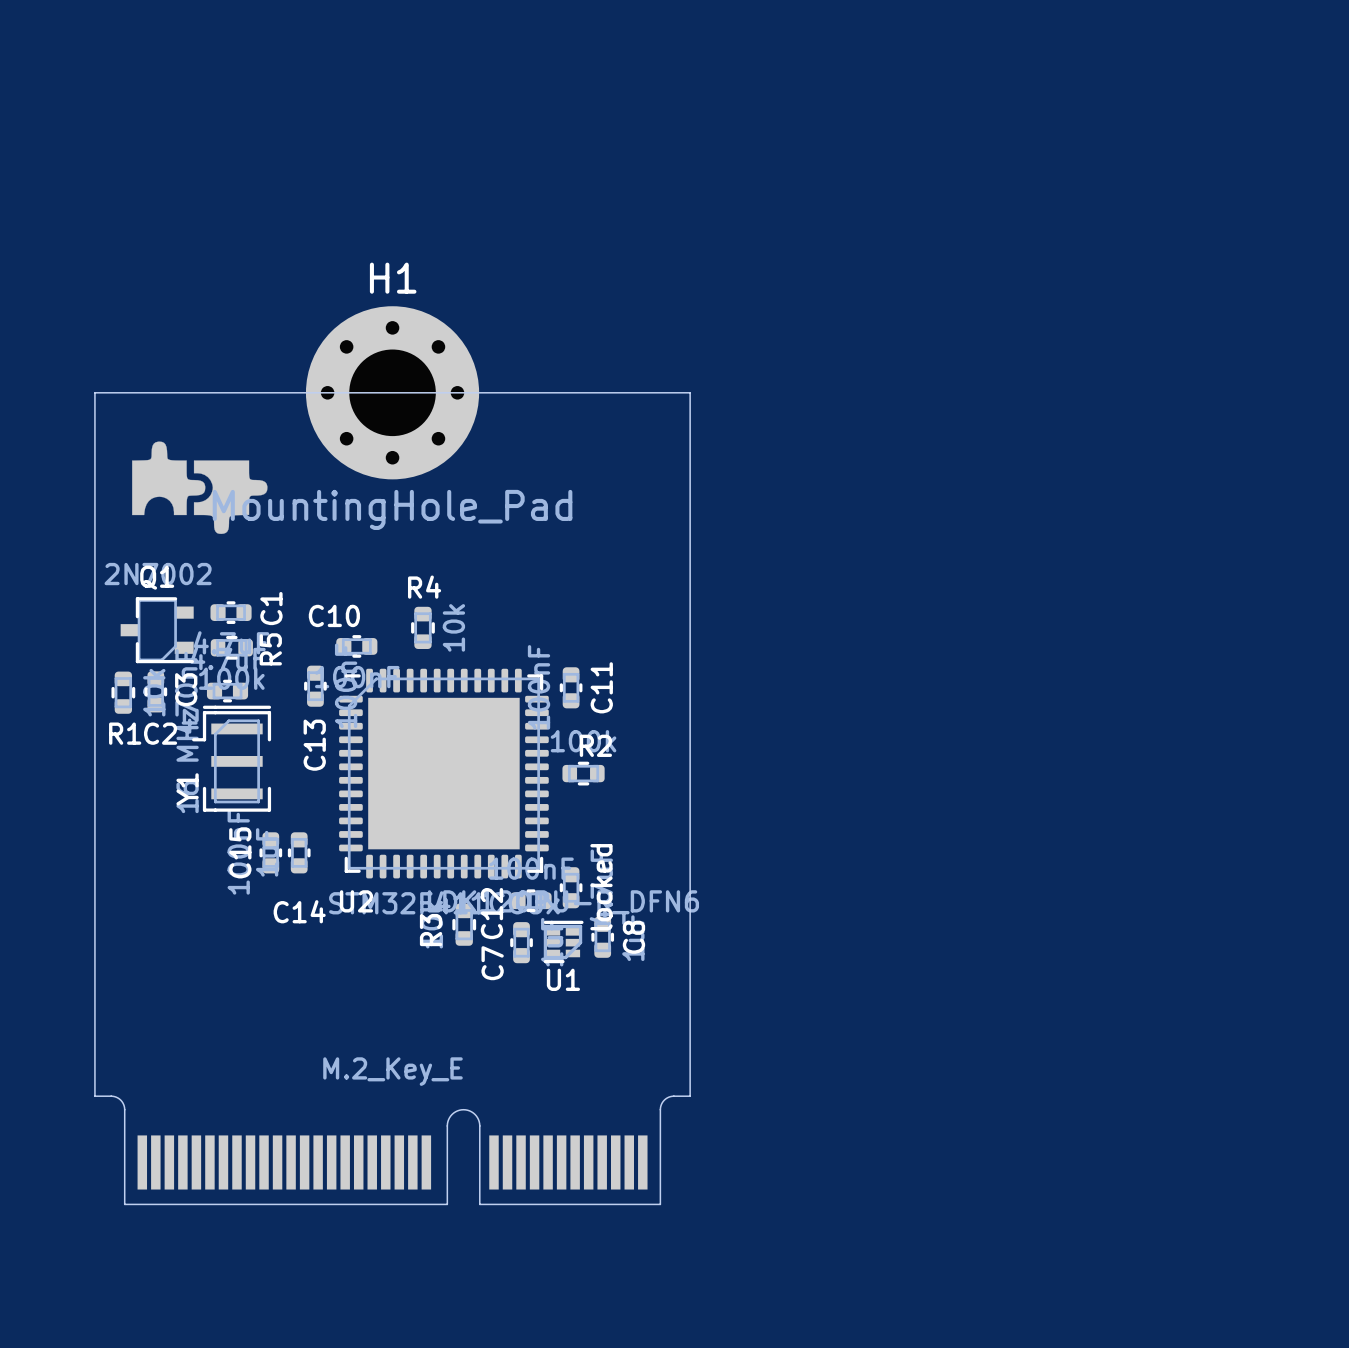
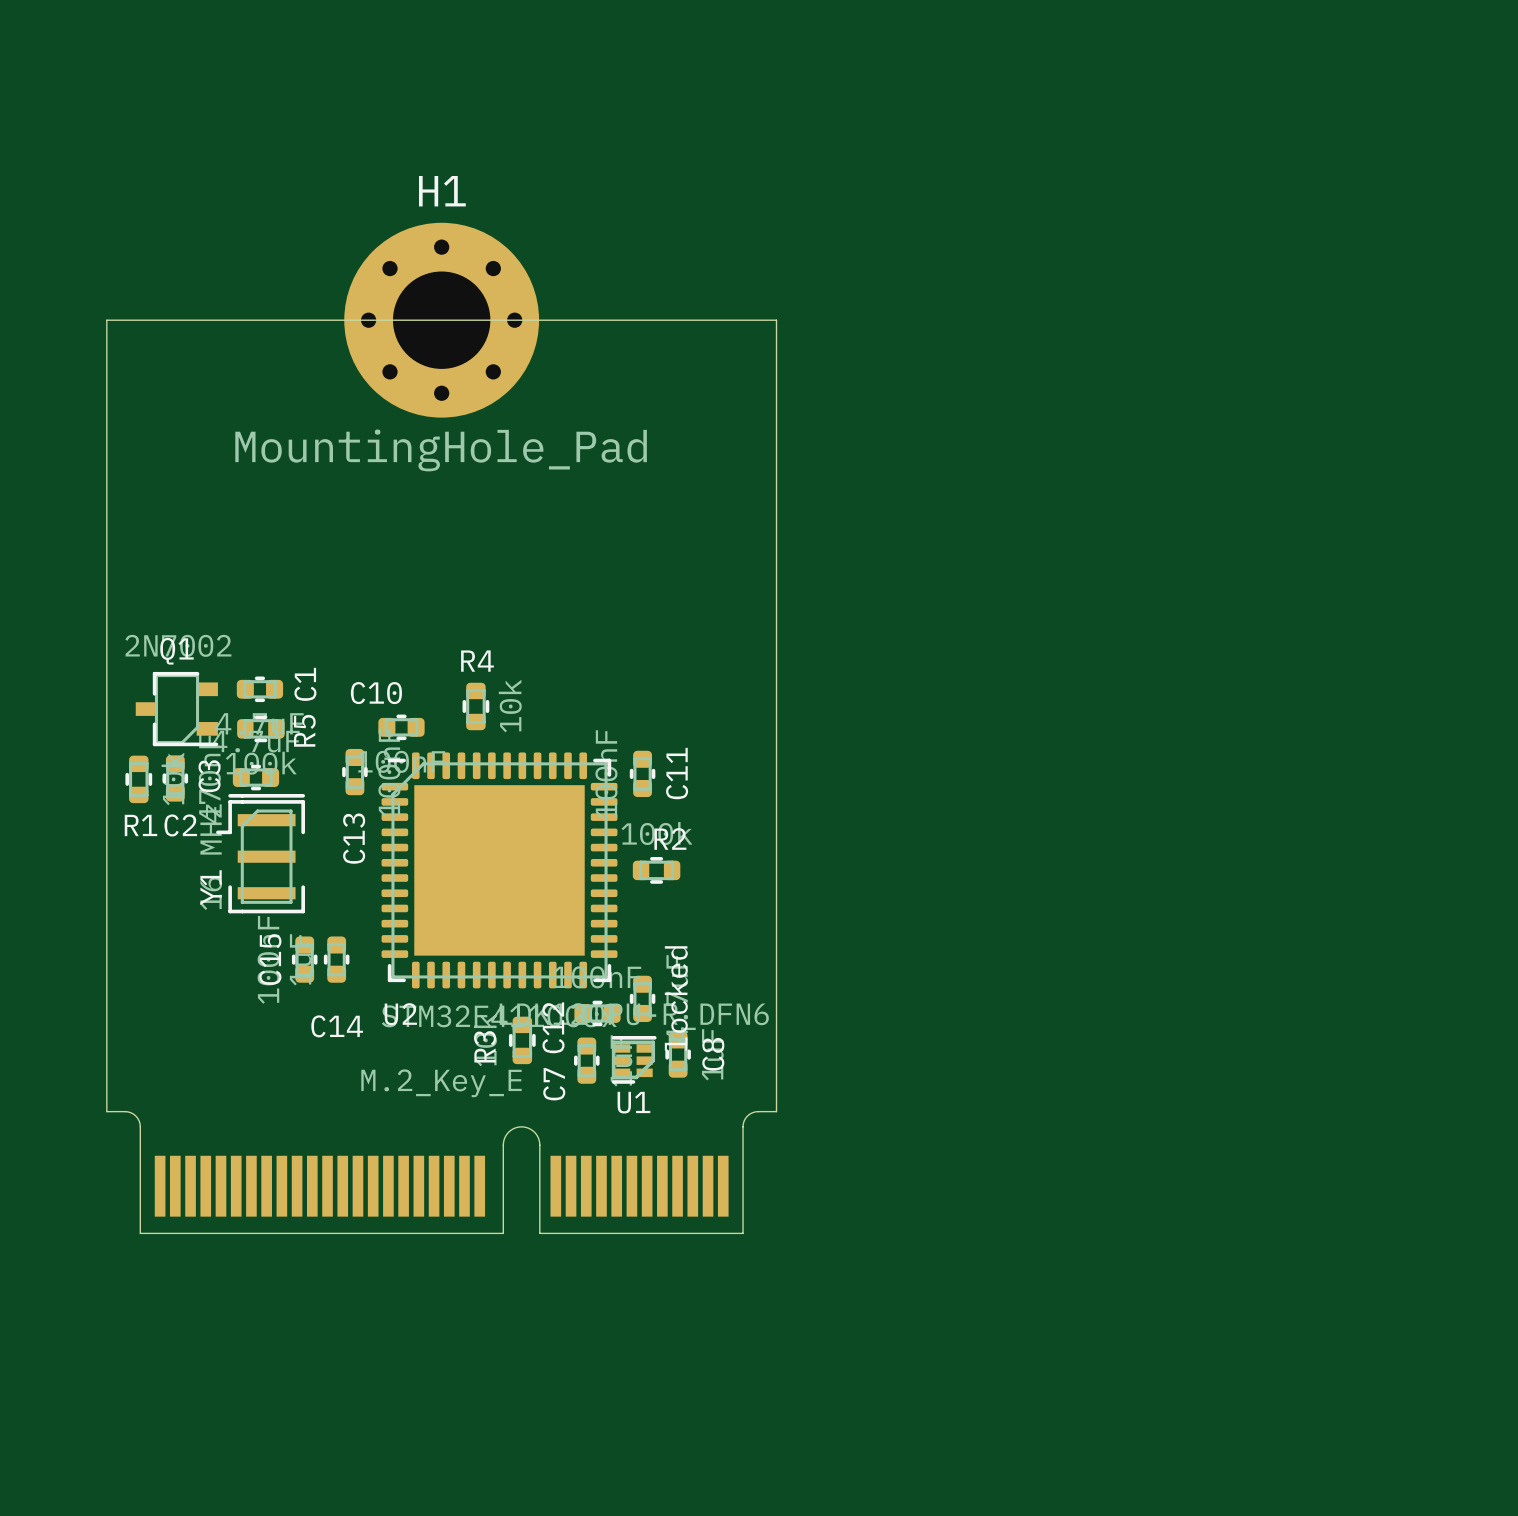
board edge: (94, 392) (690, 392) -> (106, 441) (106, 320) (776, 320) (776, 441)
H1 position: (392, 392) -> (441, 320)
part: (199, 487) -> none
board edge: (94, 987) (94, 1096) -> none
board edge: (690, 987) (690, 1096) -> none
part position: (392, 1150) -> (441, 1172)

